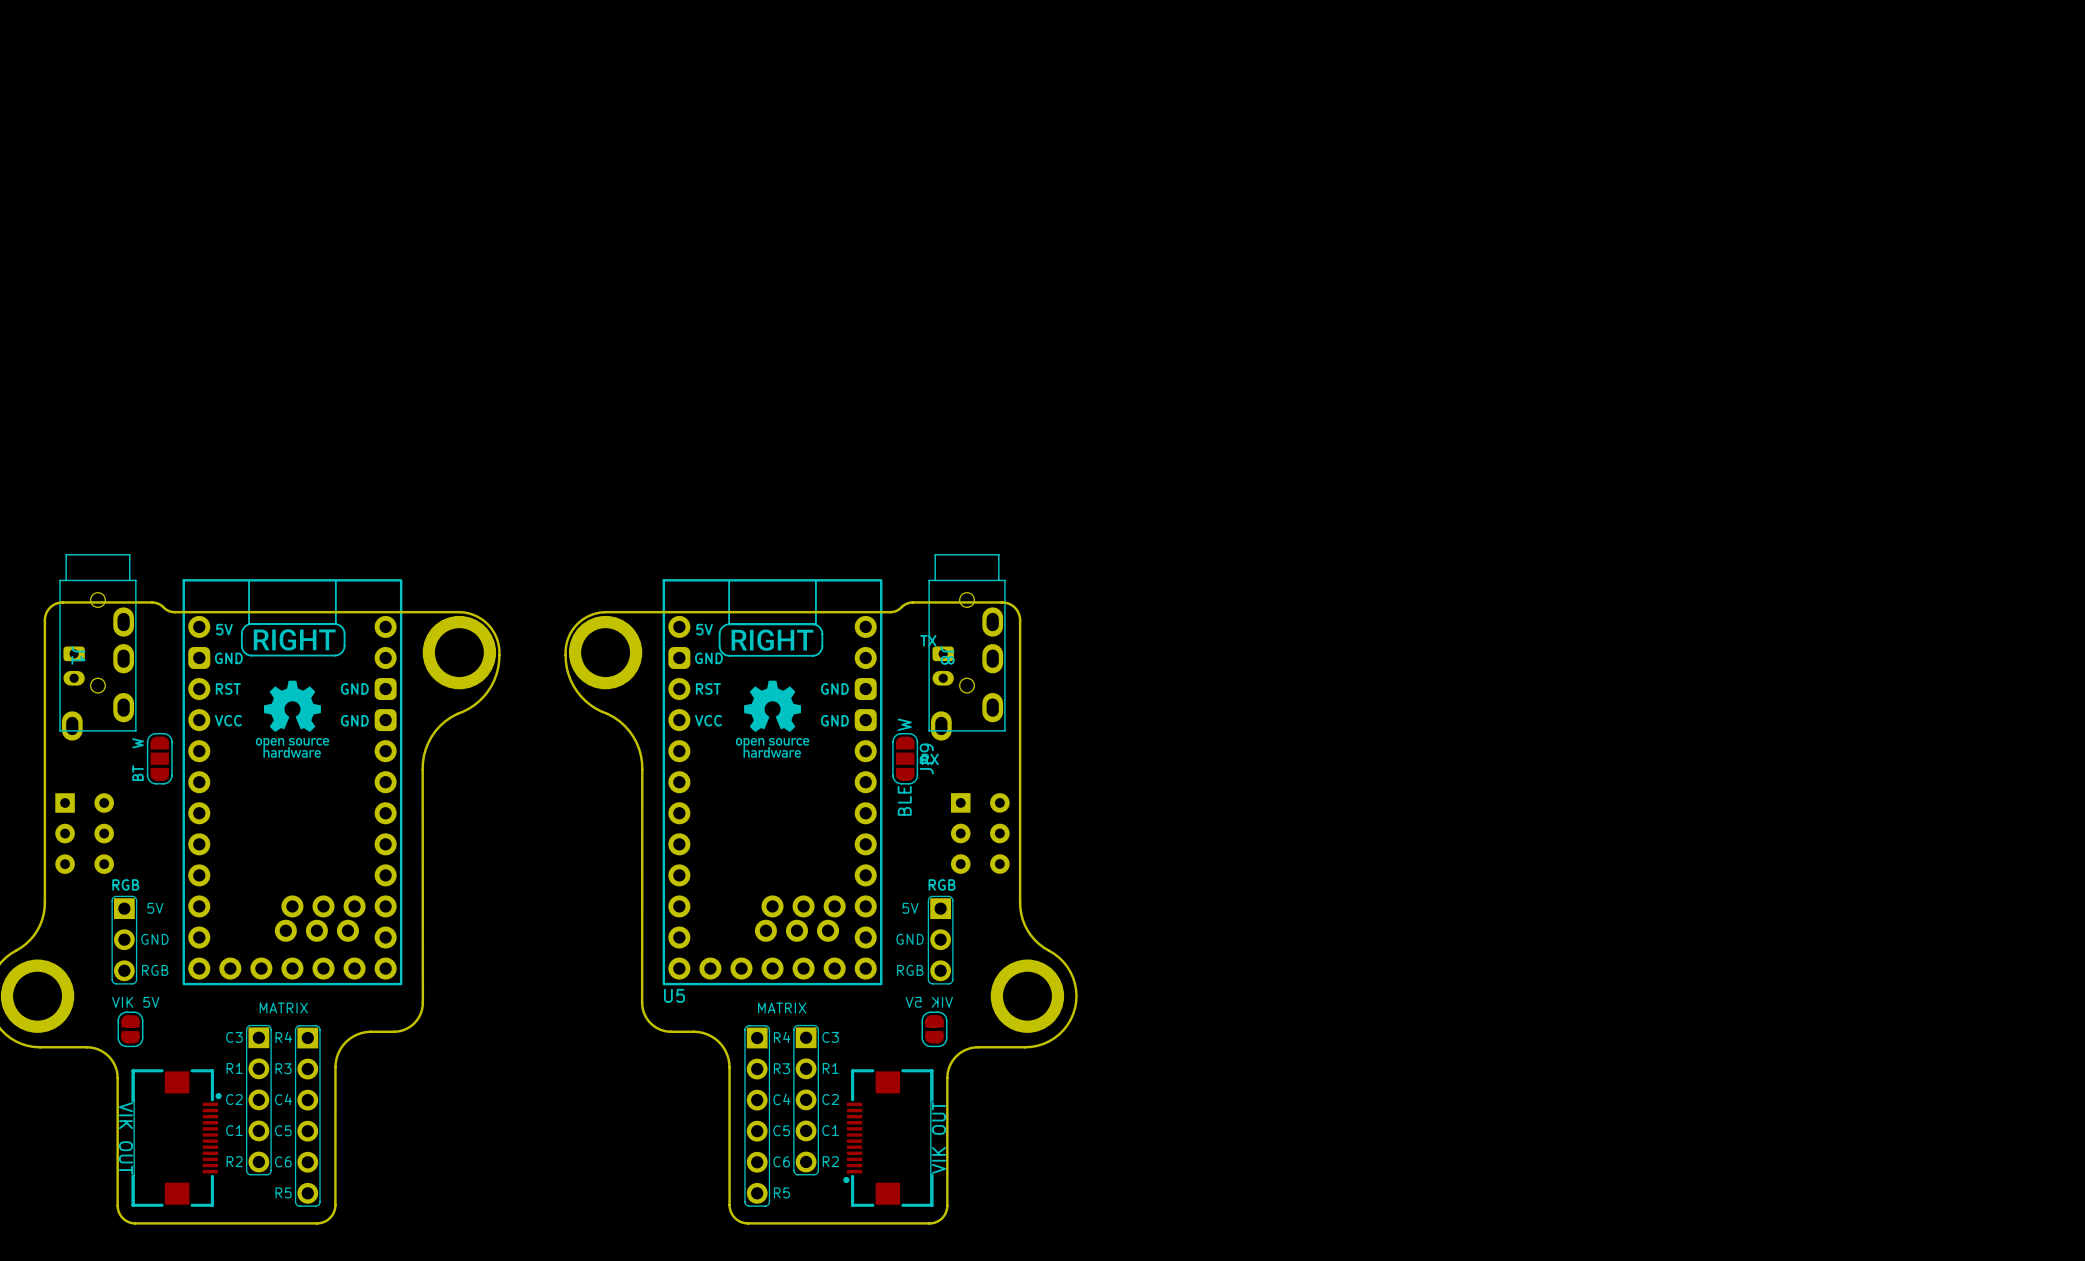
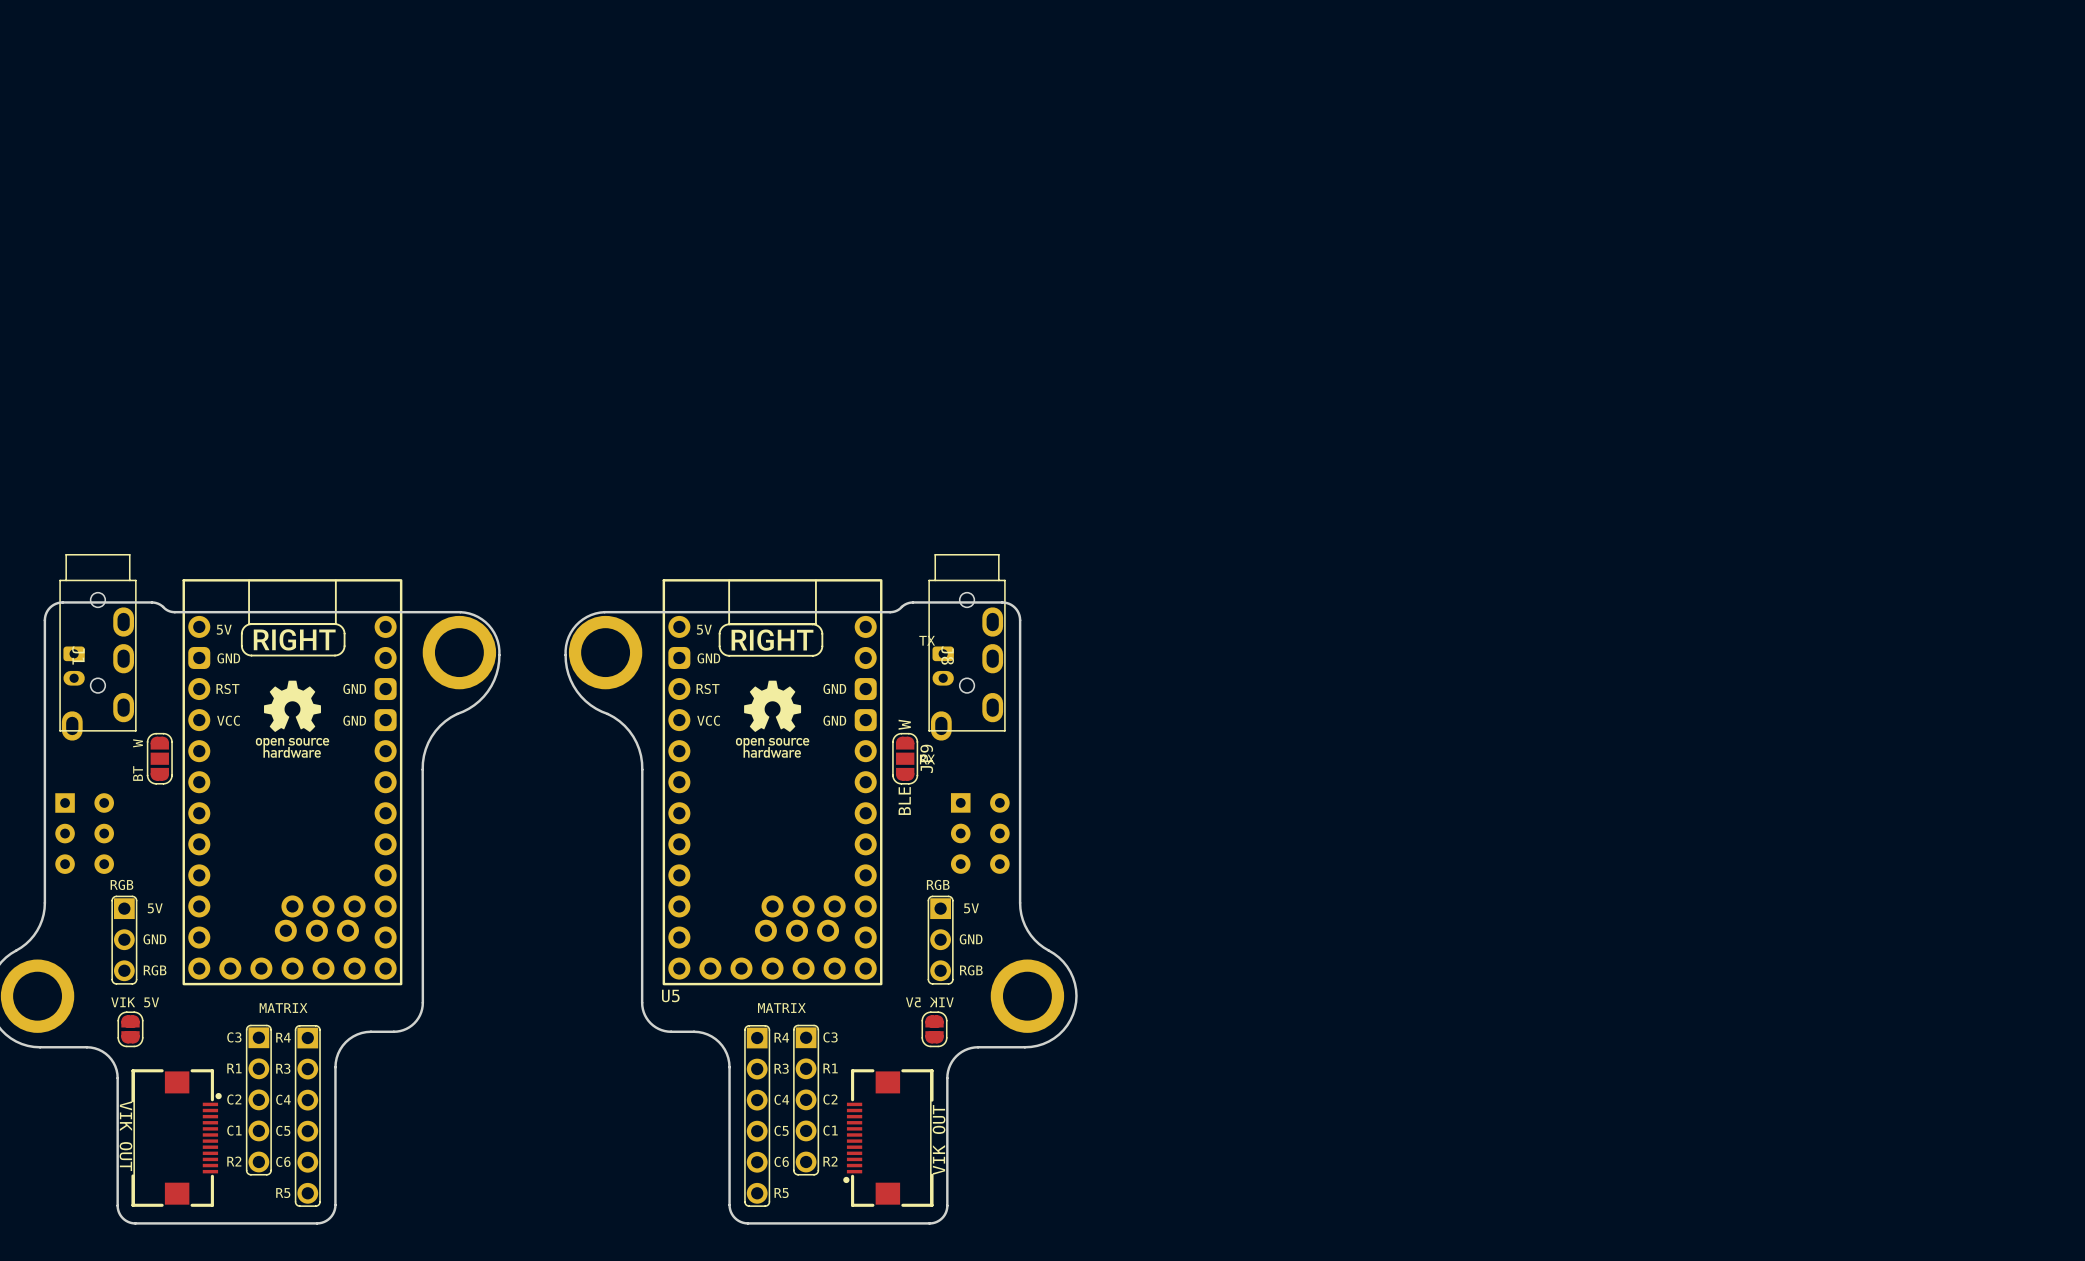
part side: bottom (940, 940) -> top (940, 940)

